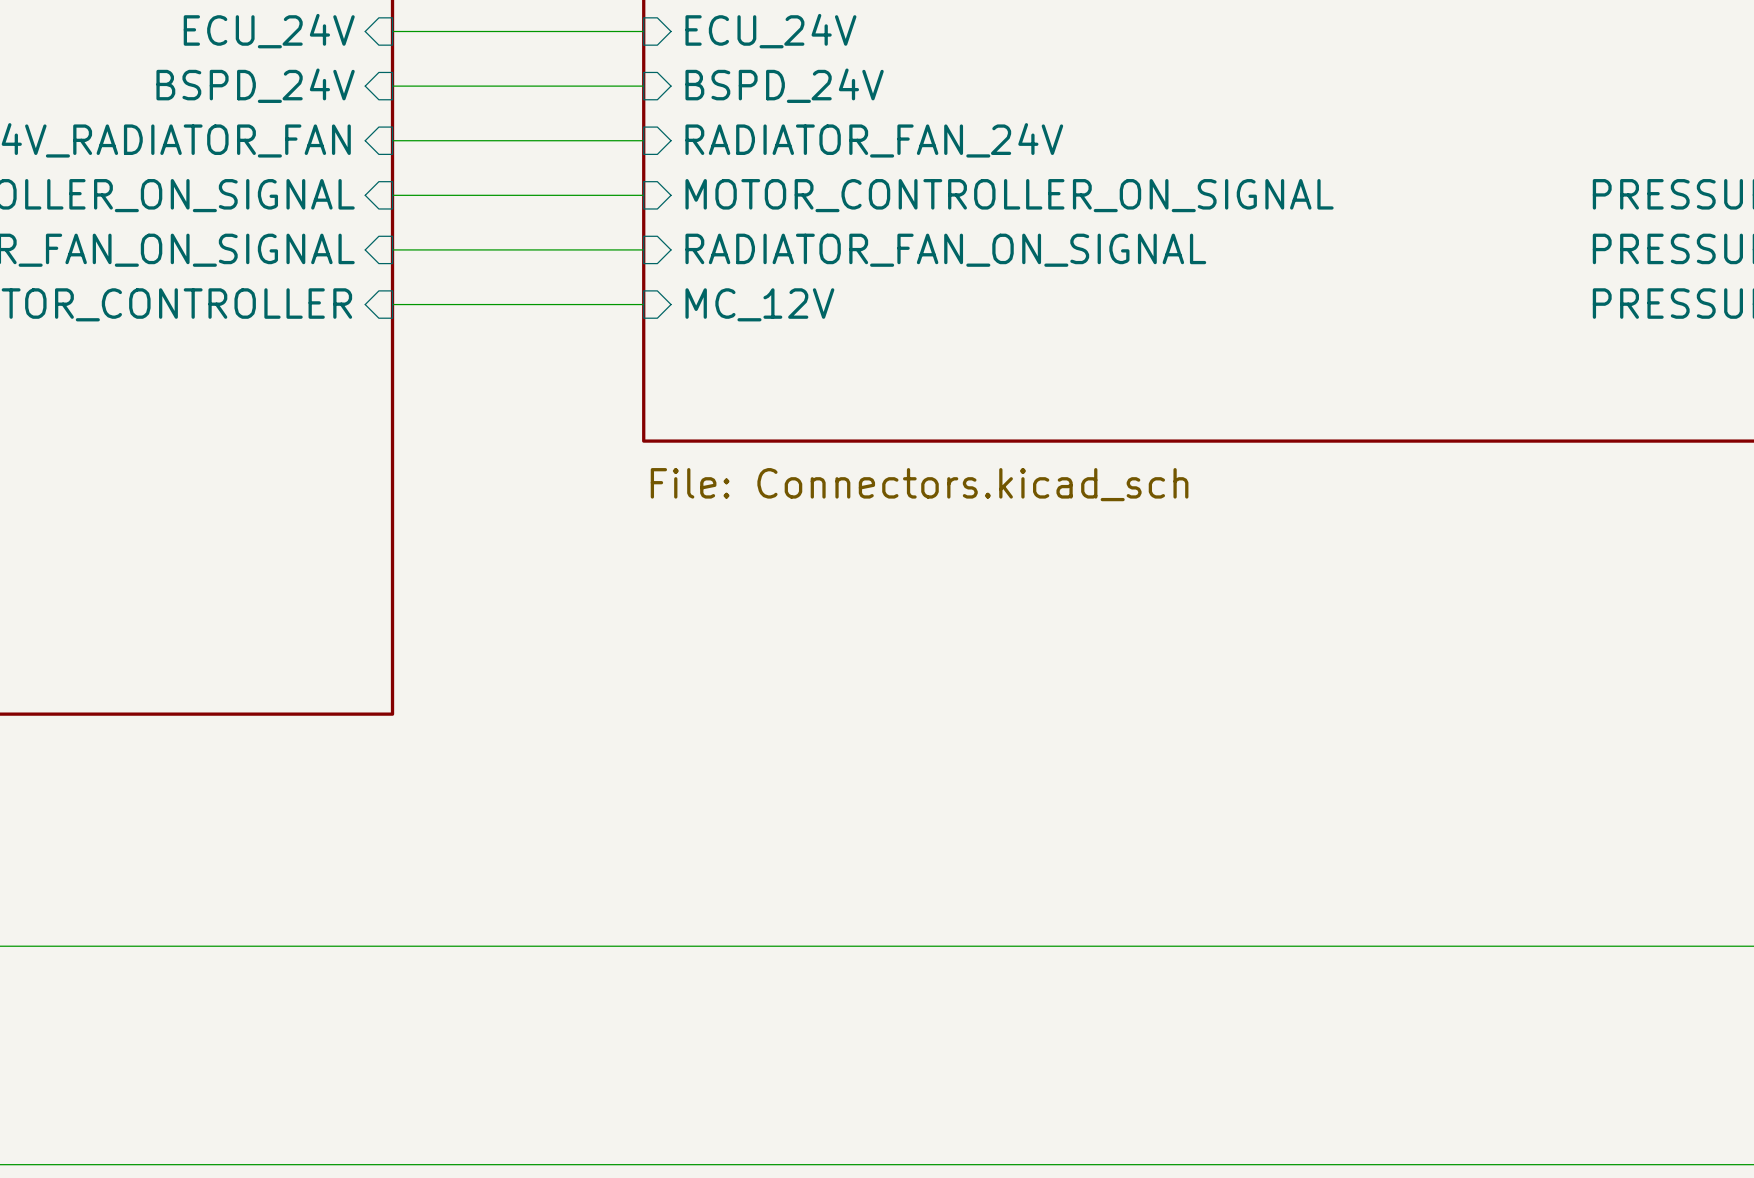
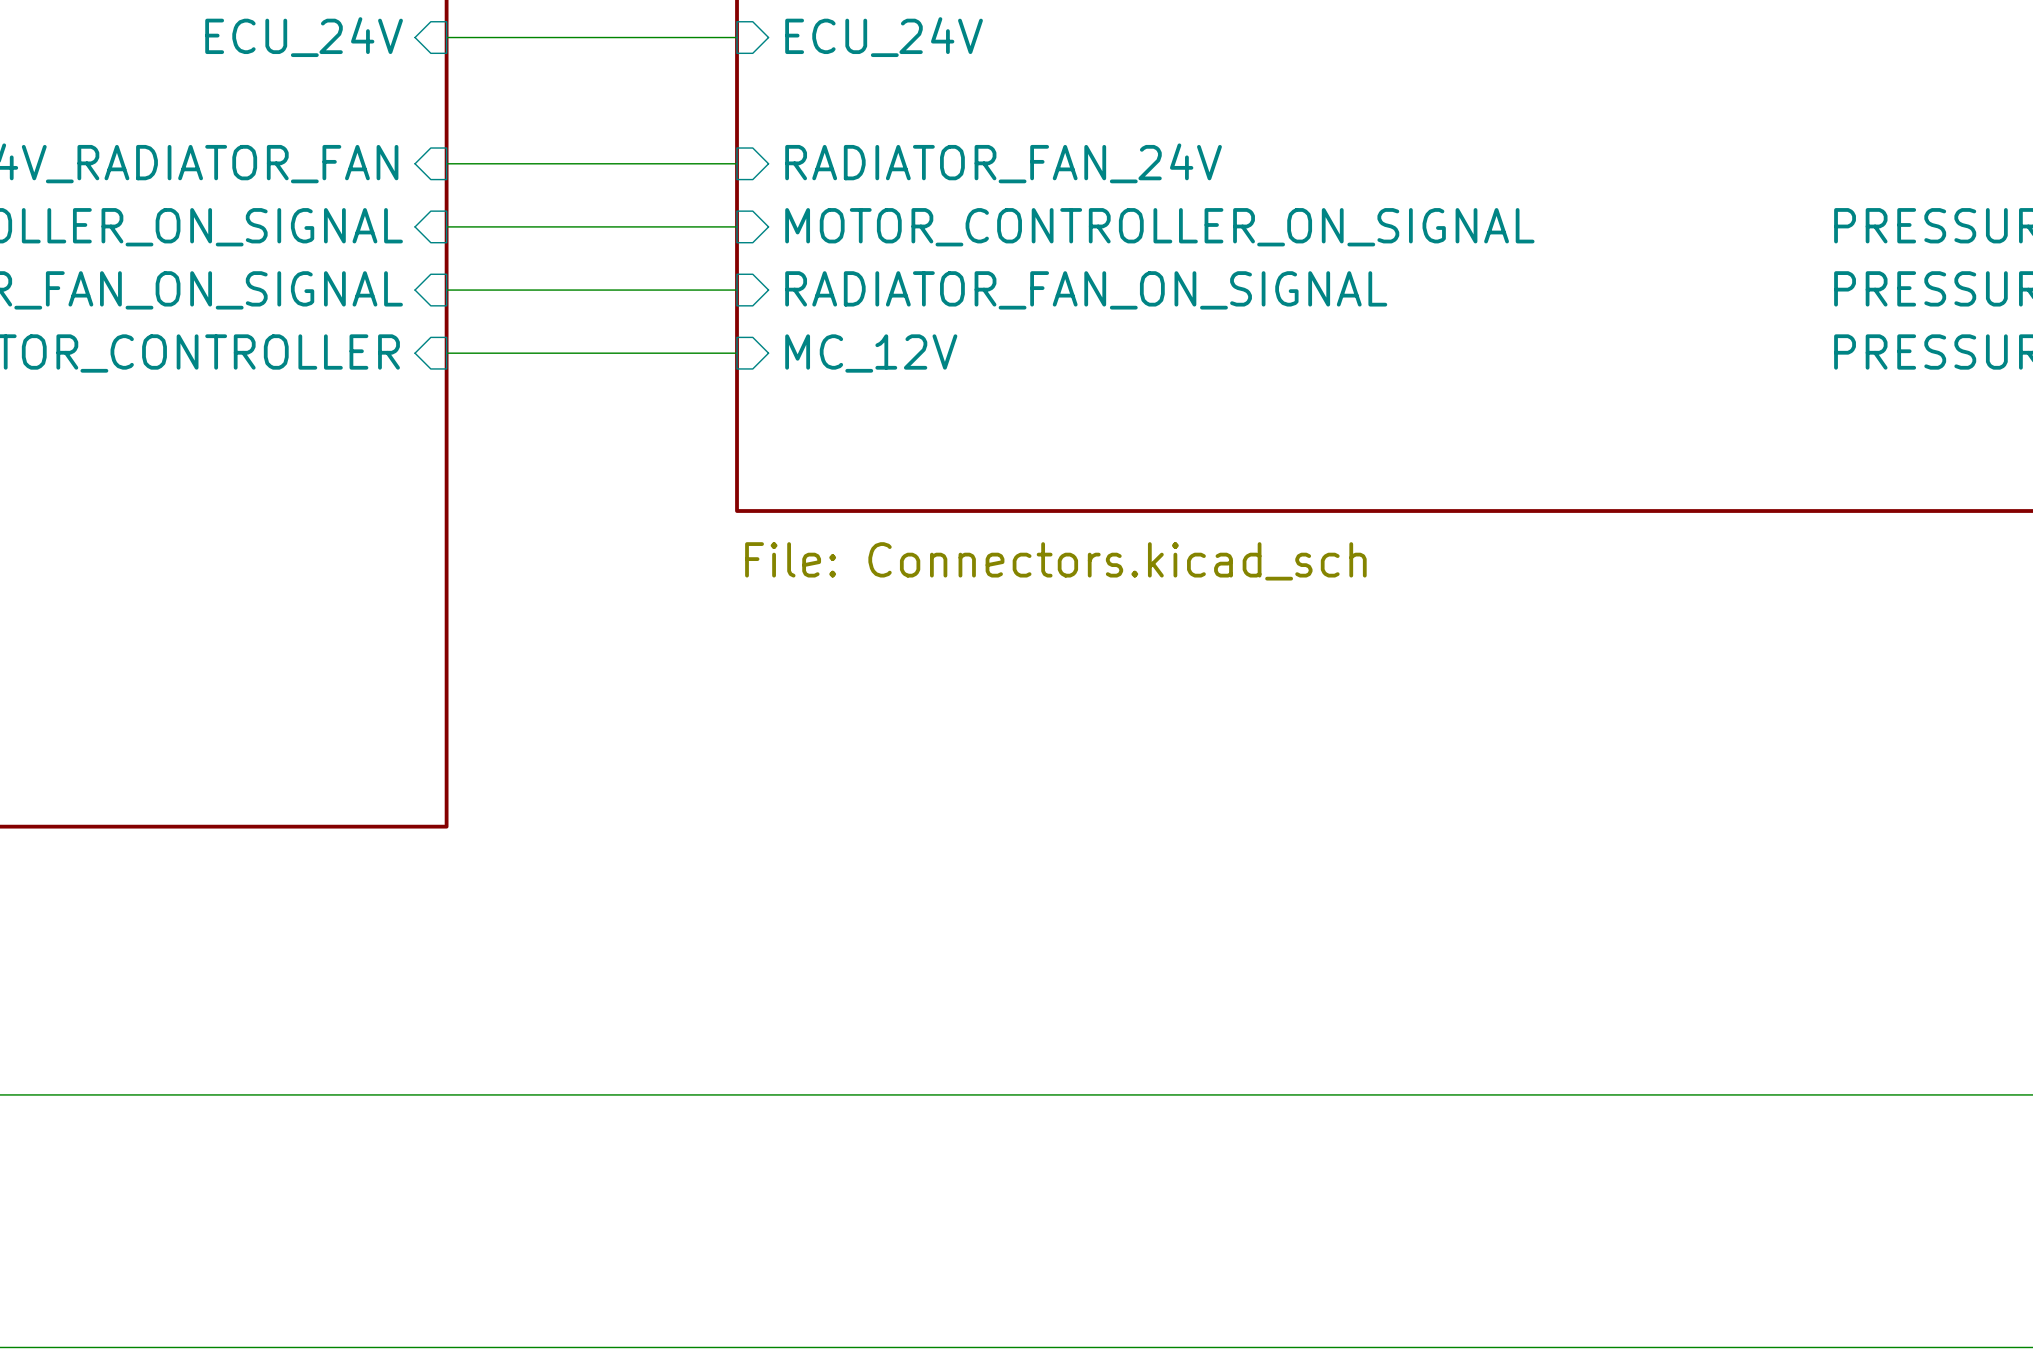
sheet pin: BSPD_24V (255, 85) -> none
sheet pin: BSPD_24V (784, 85) -> none
wire: (392, 86) (643, 86) -> none

